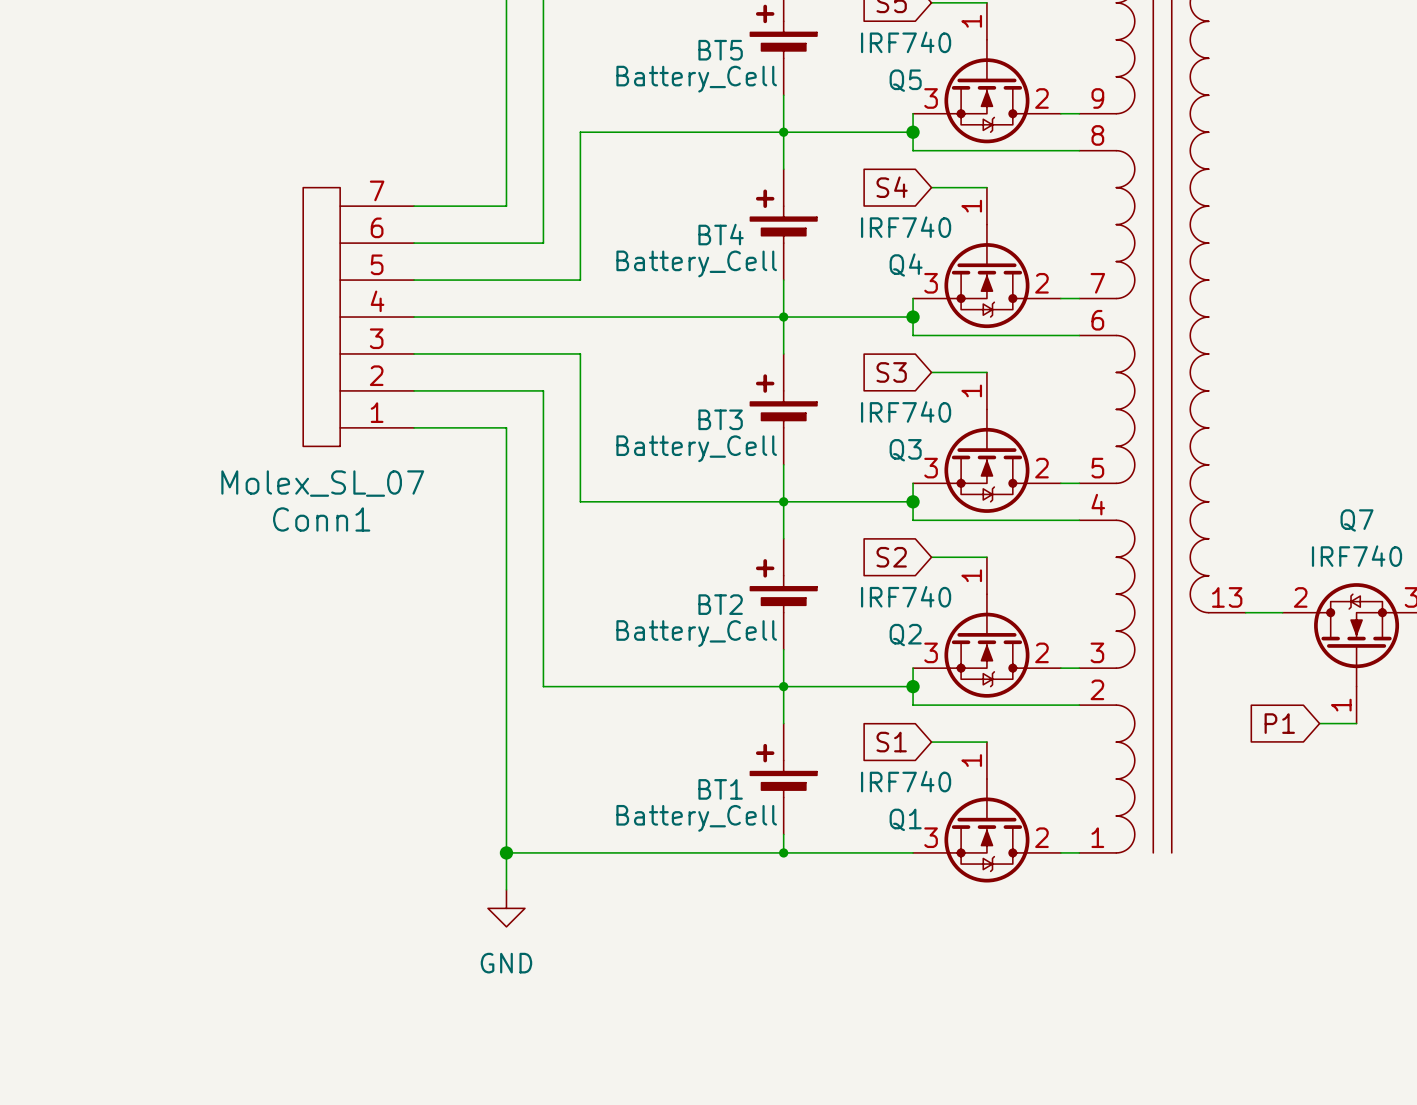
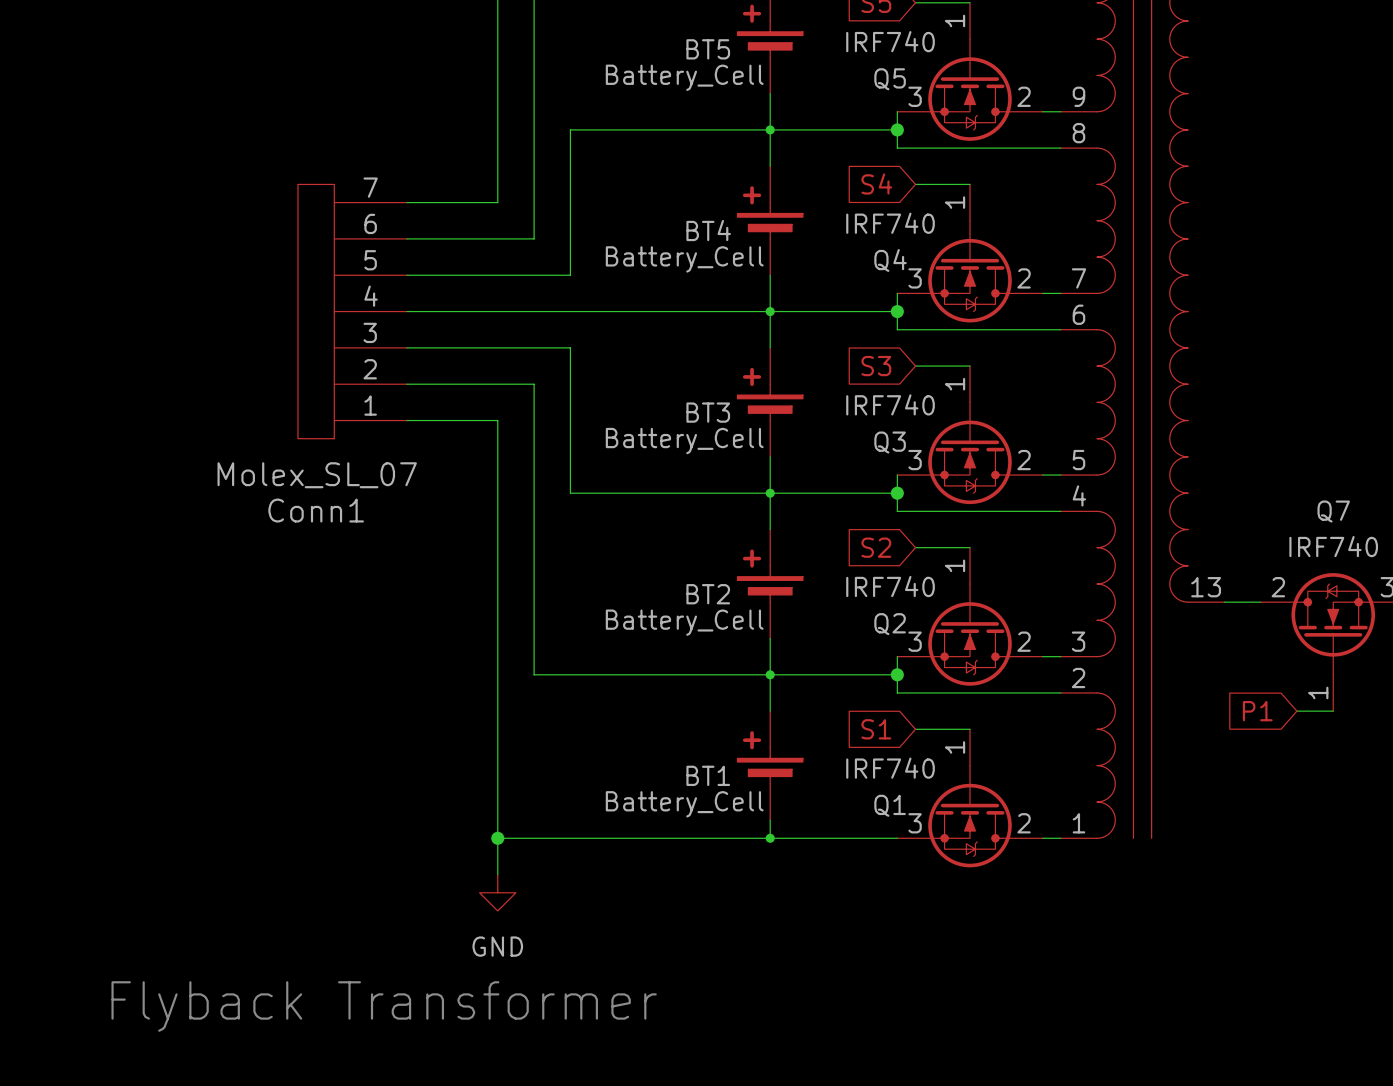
text: none -> Flyback Transformer (384, 1006)

